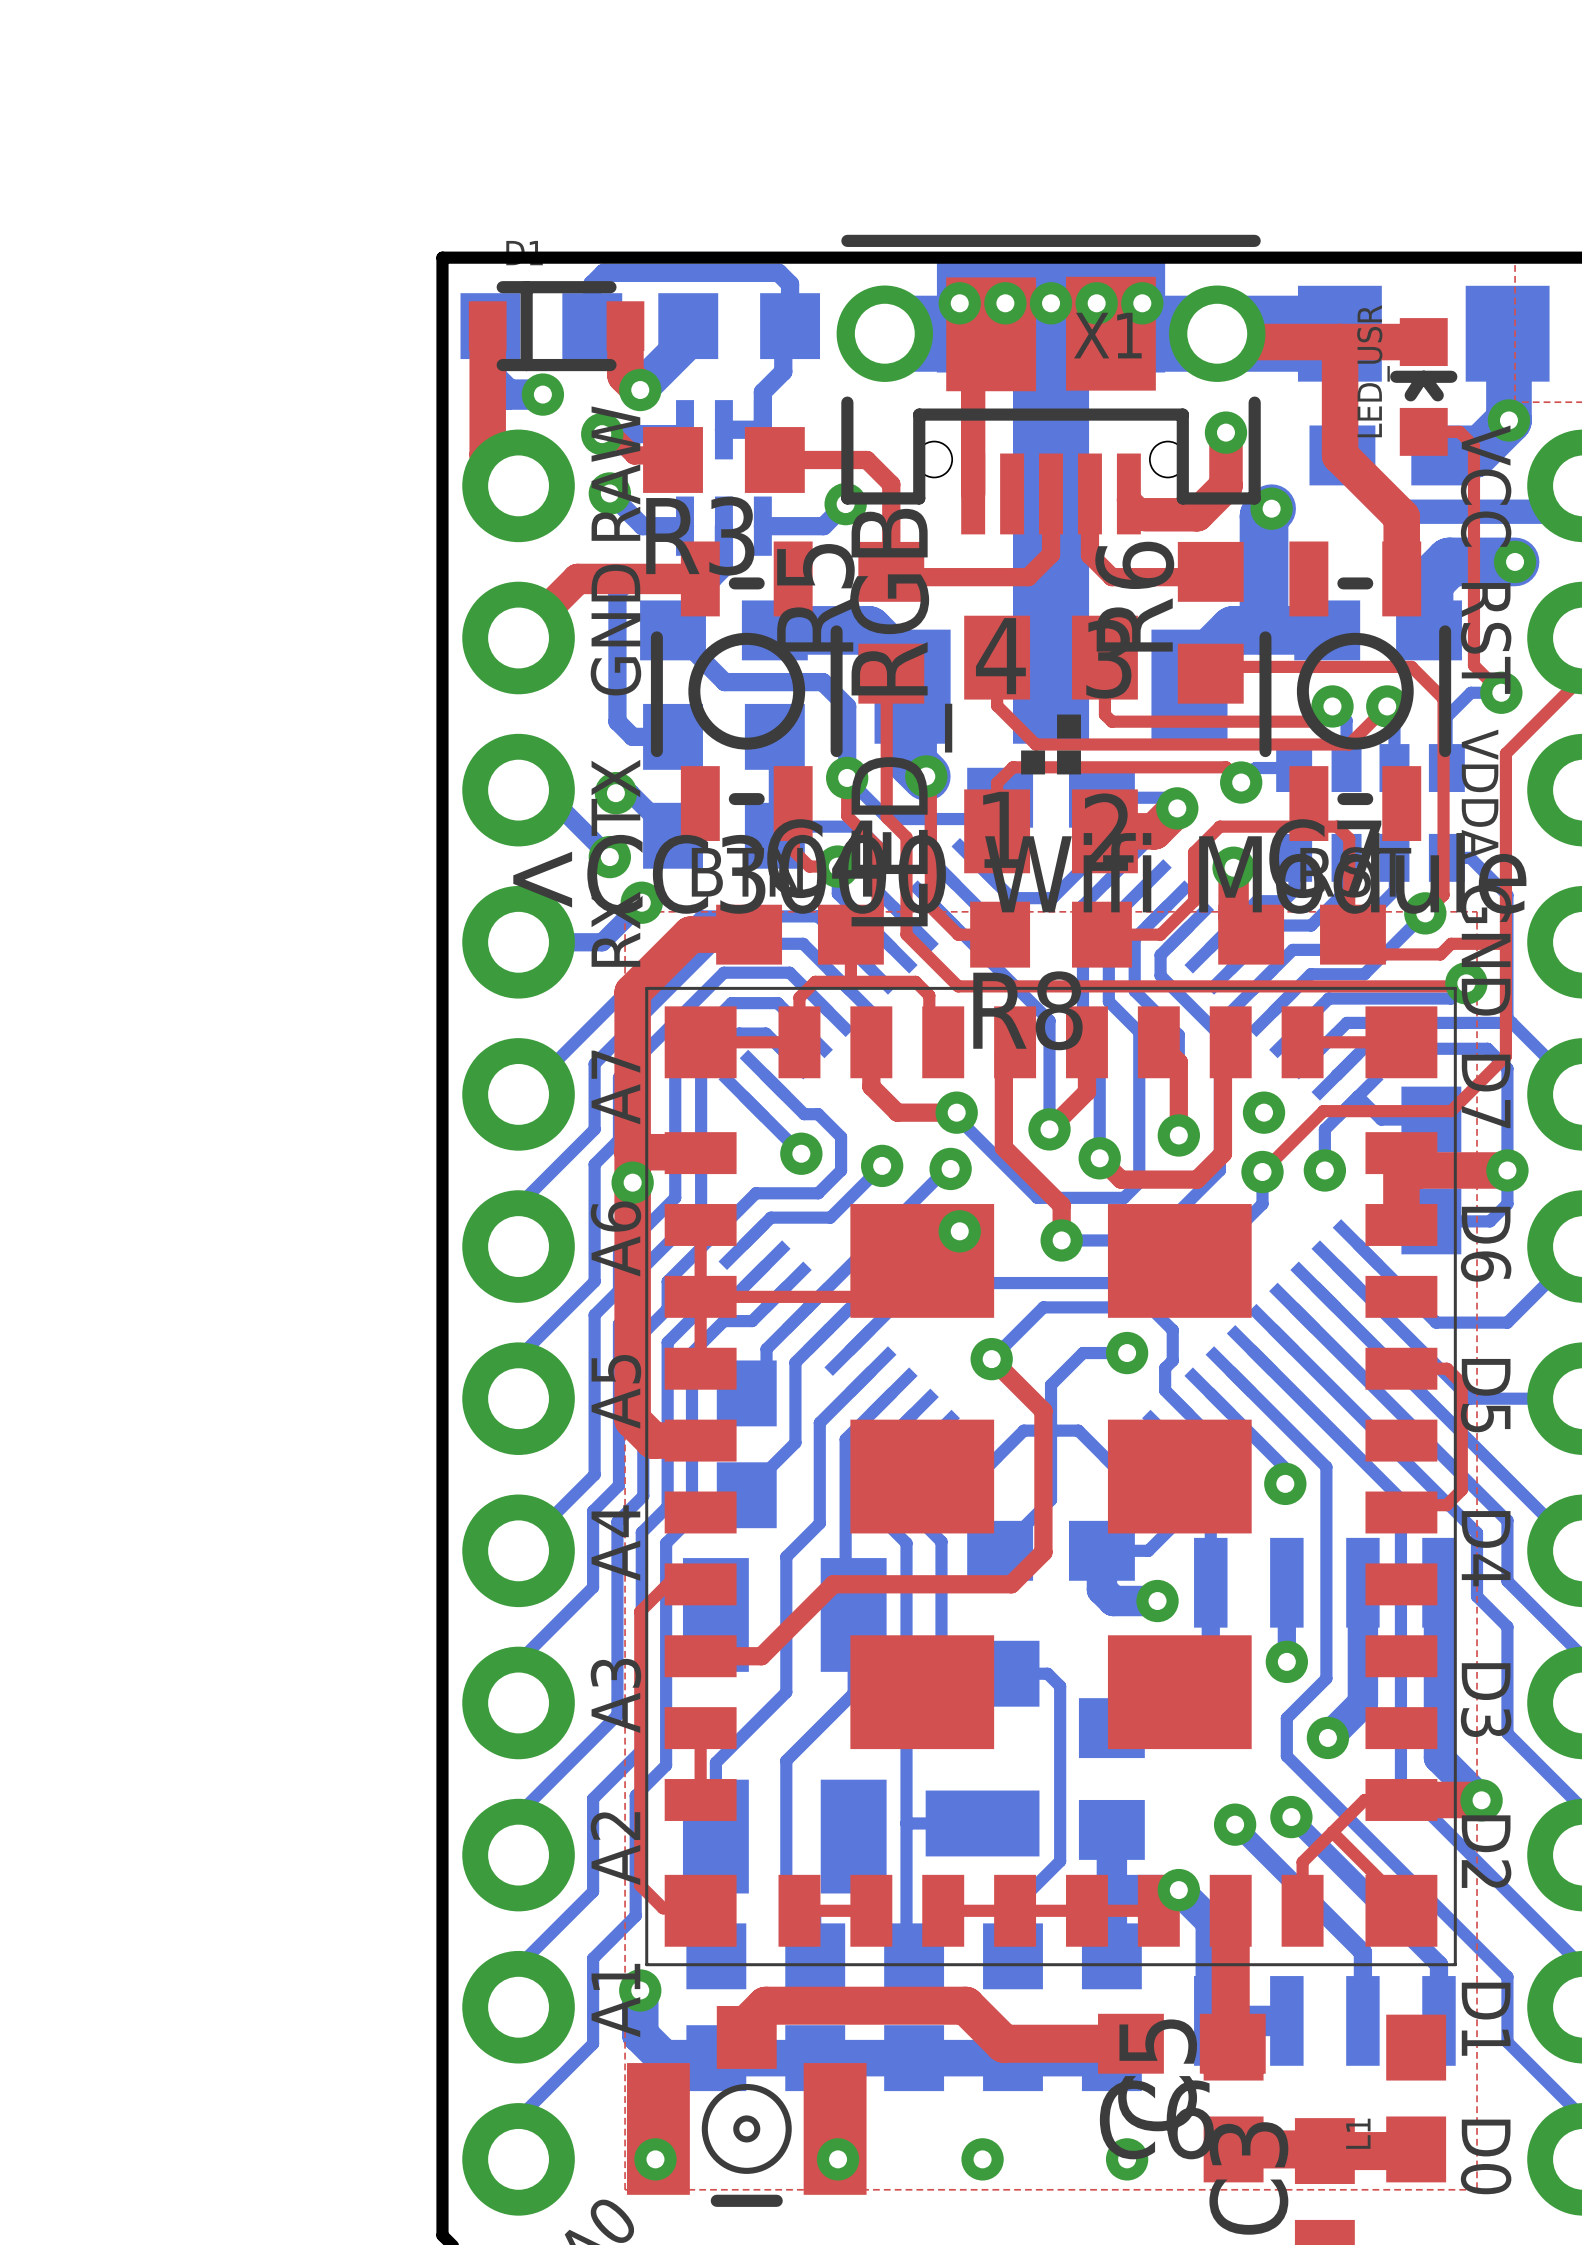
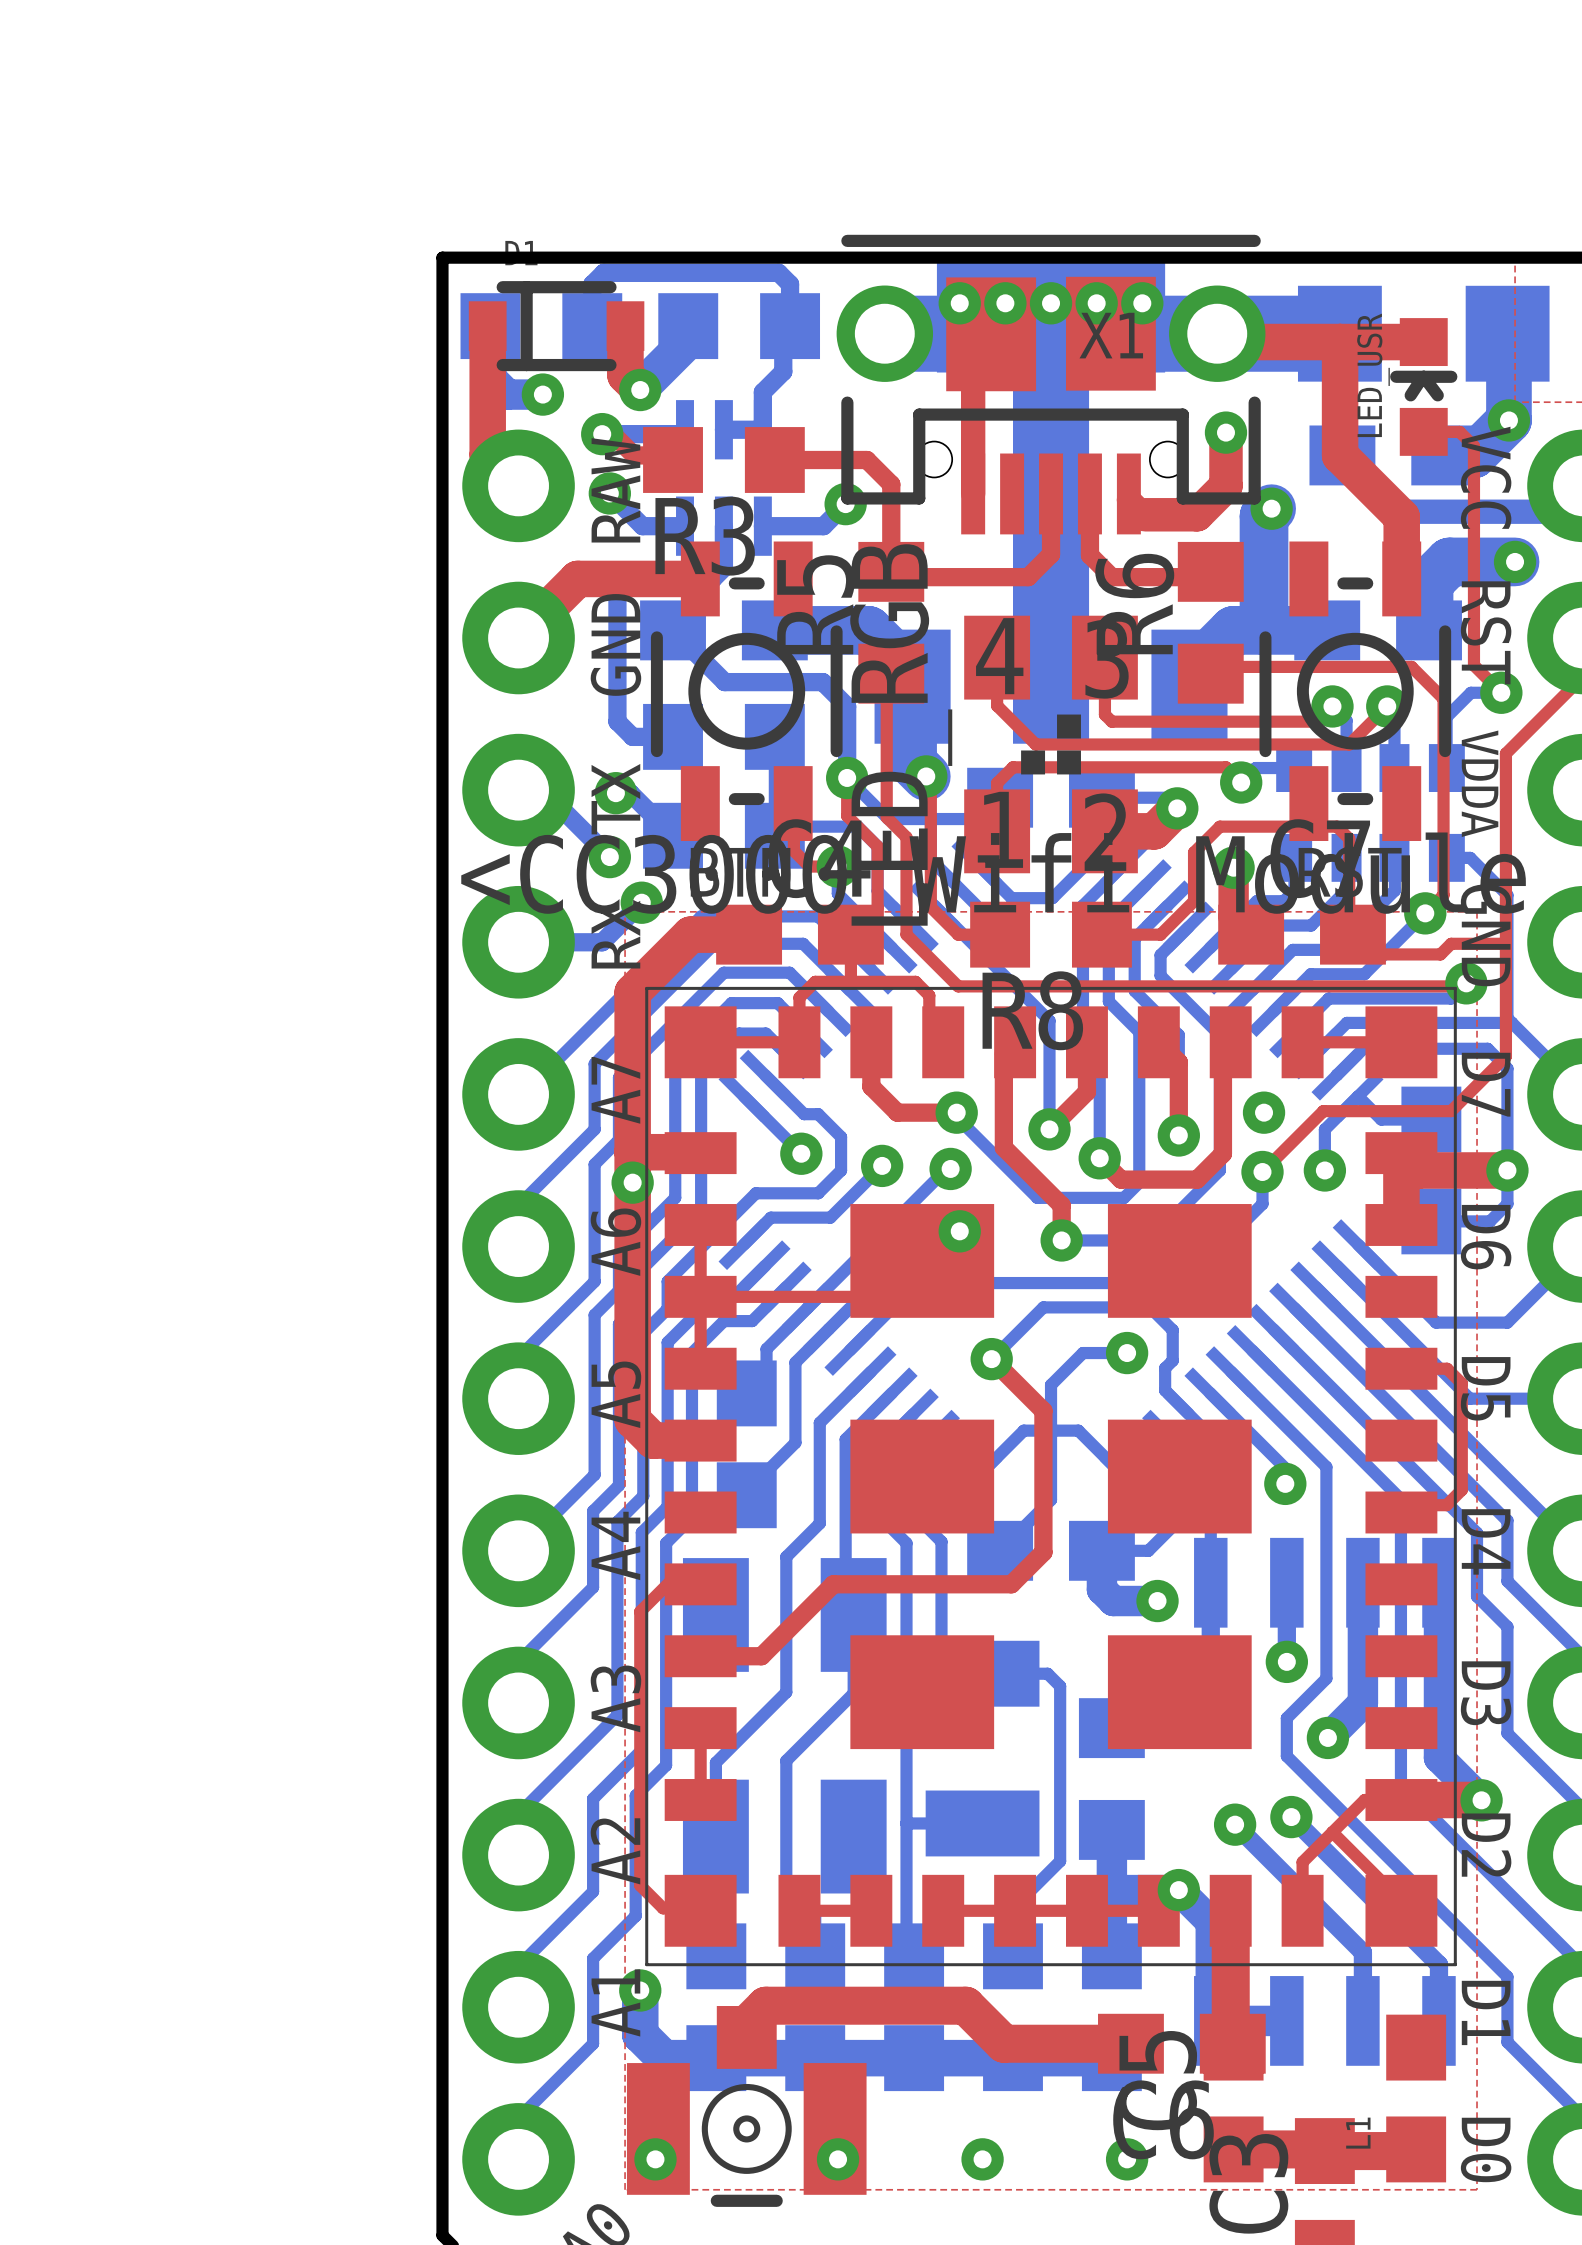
top track width: thin (700, 578) (577, 578) (518, 638) -> thick (700, 578) (577, 578) (518, 638)

